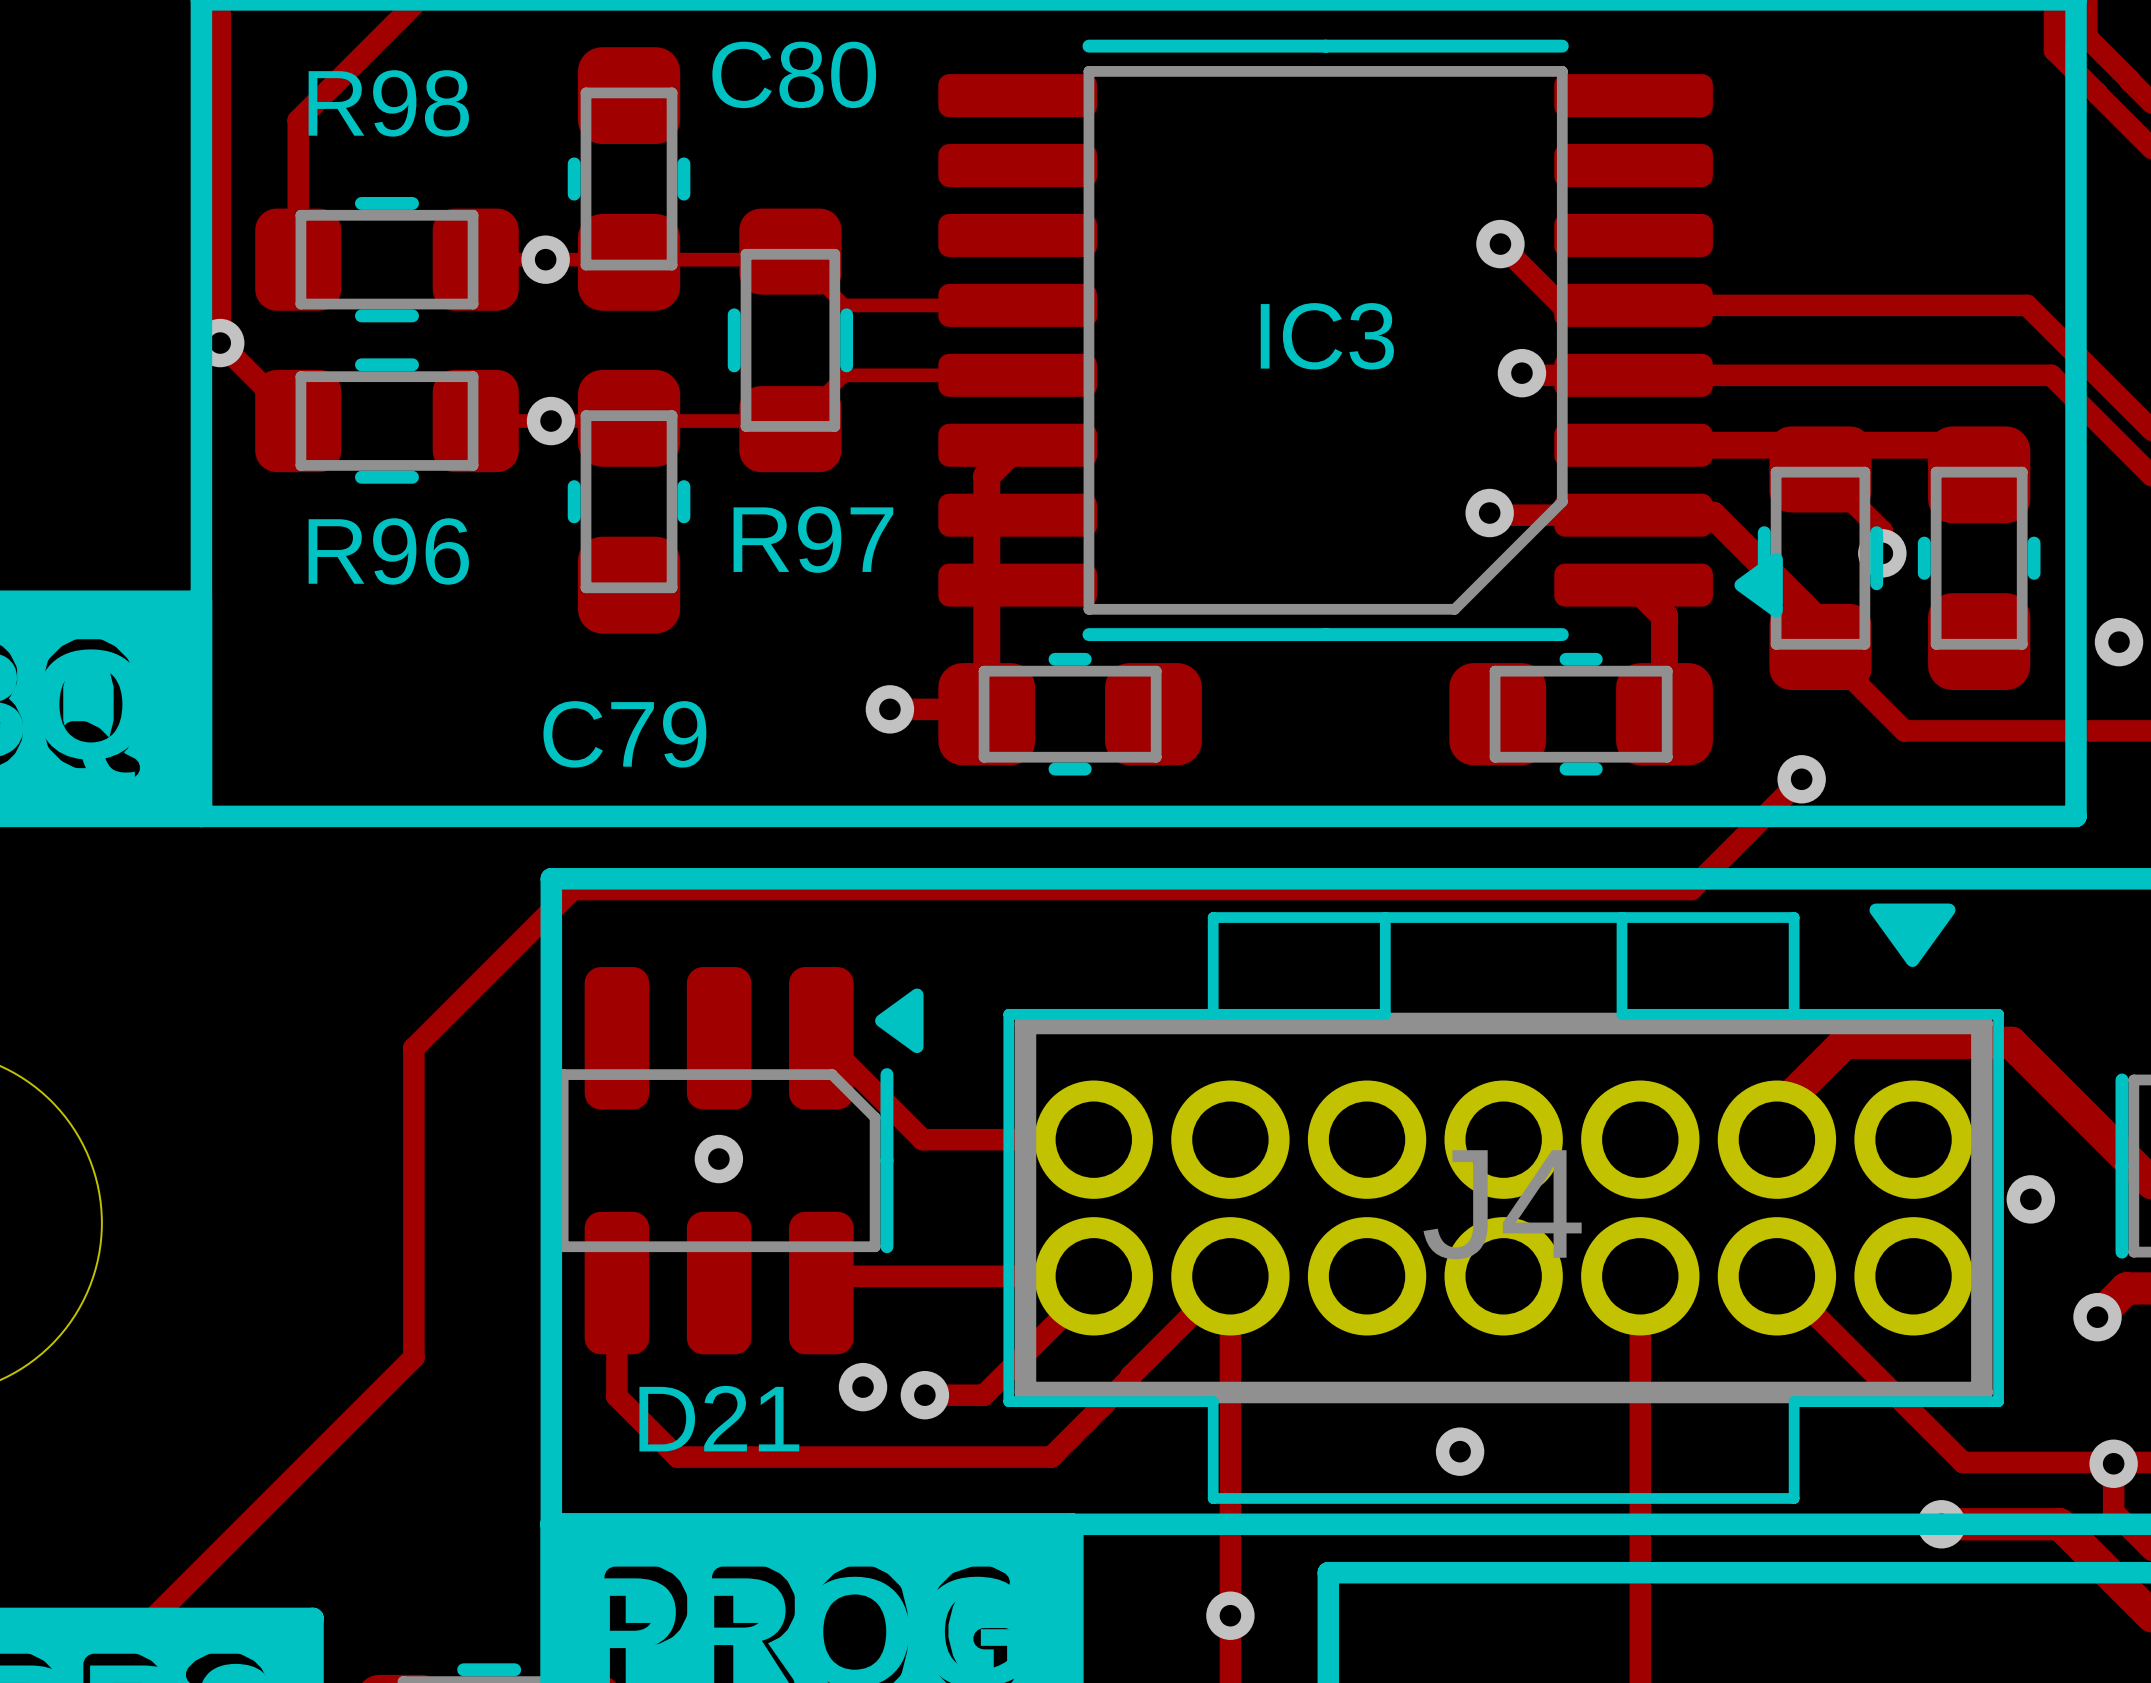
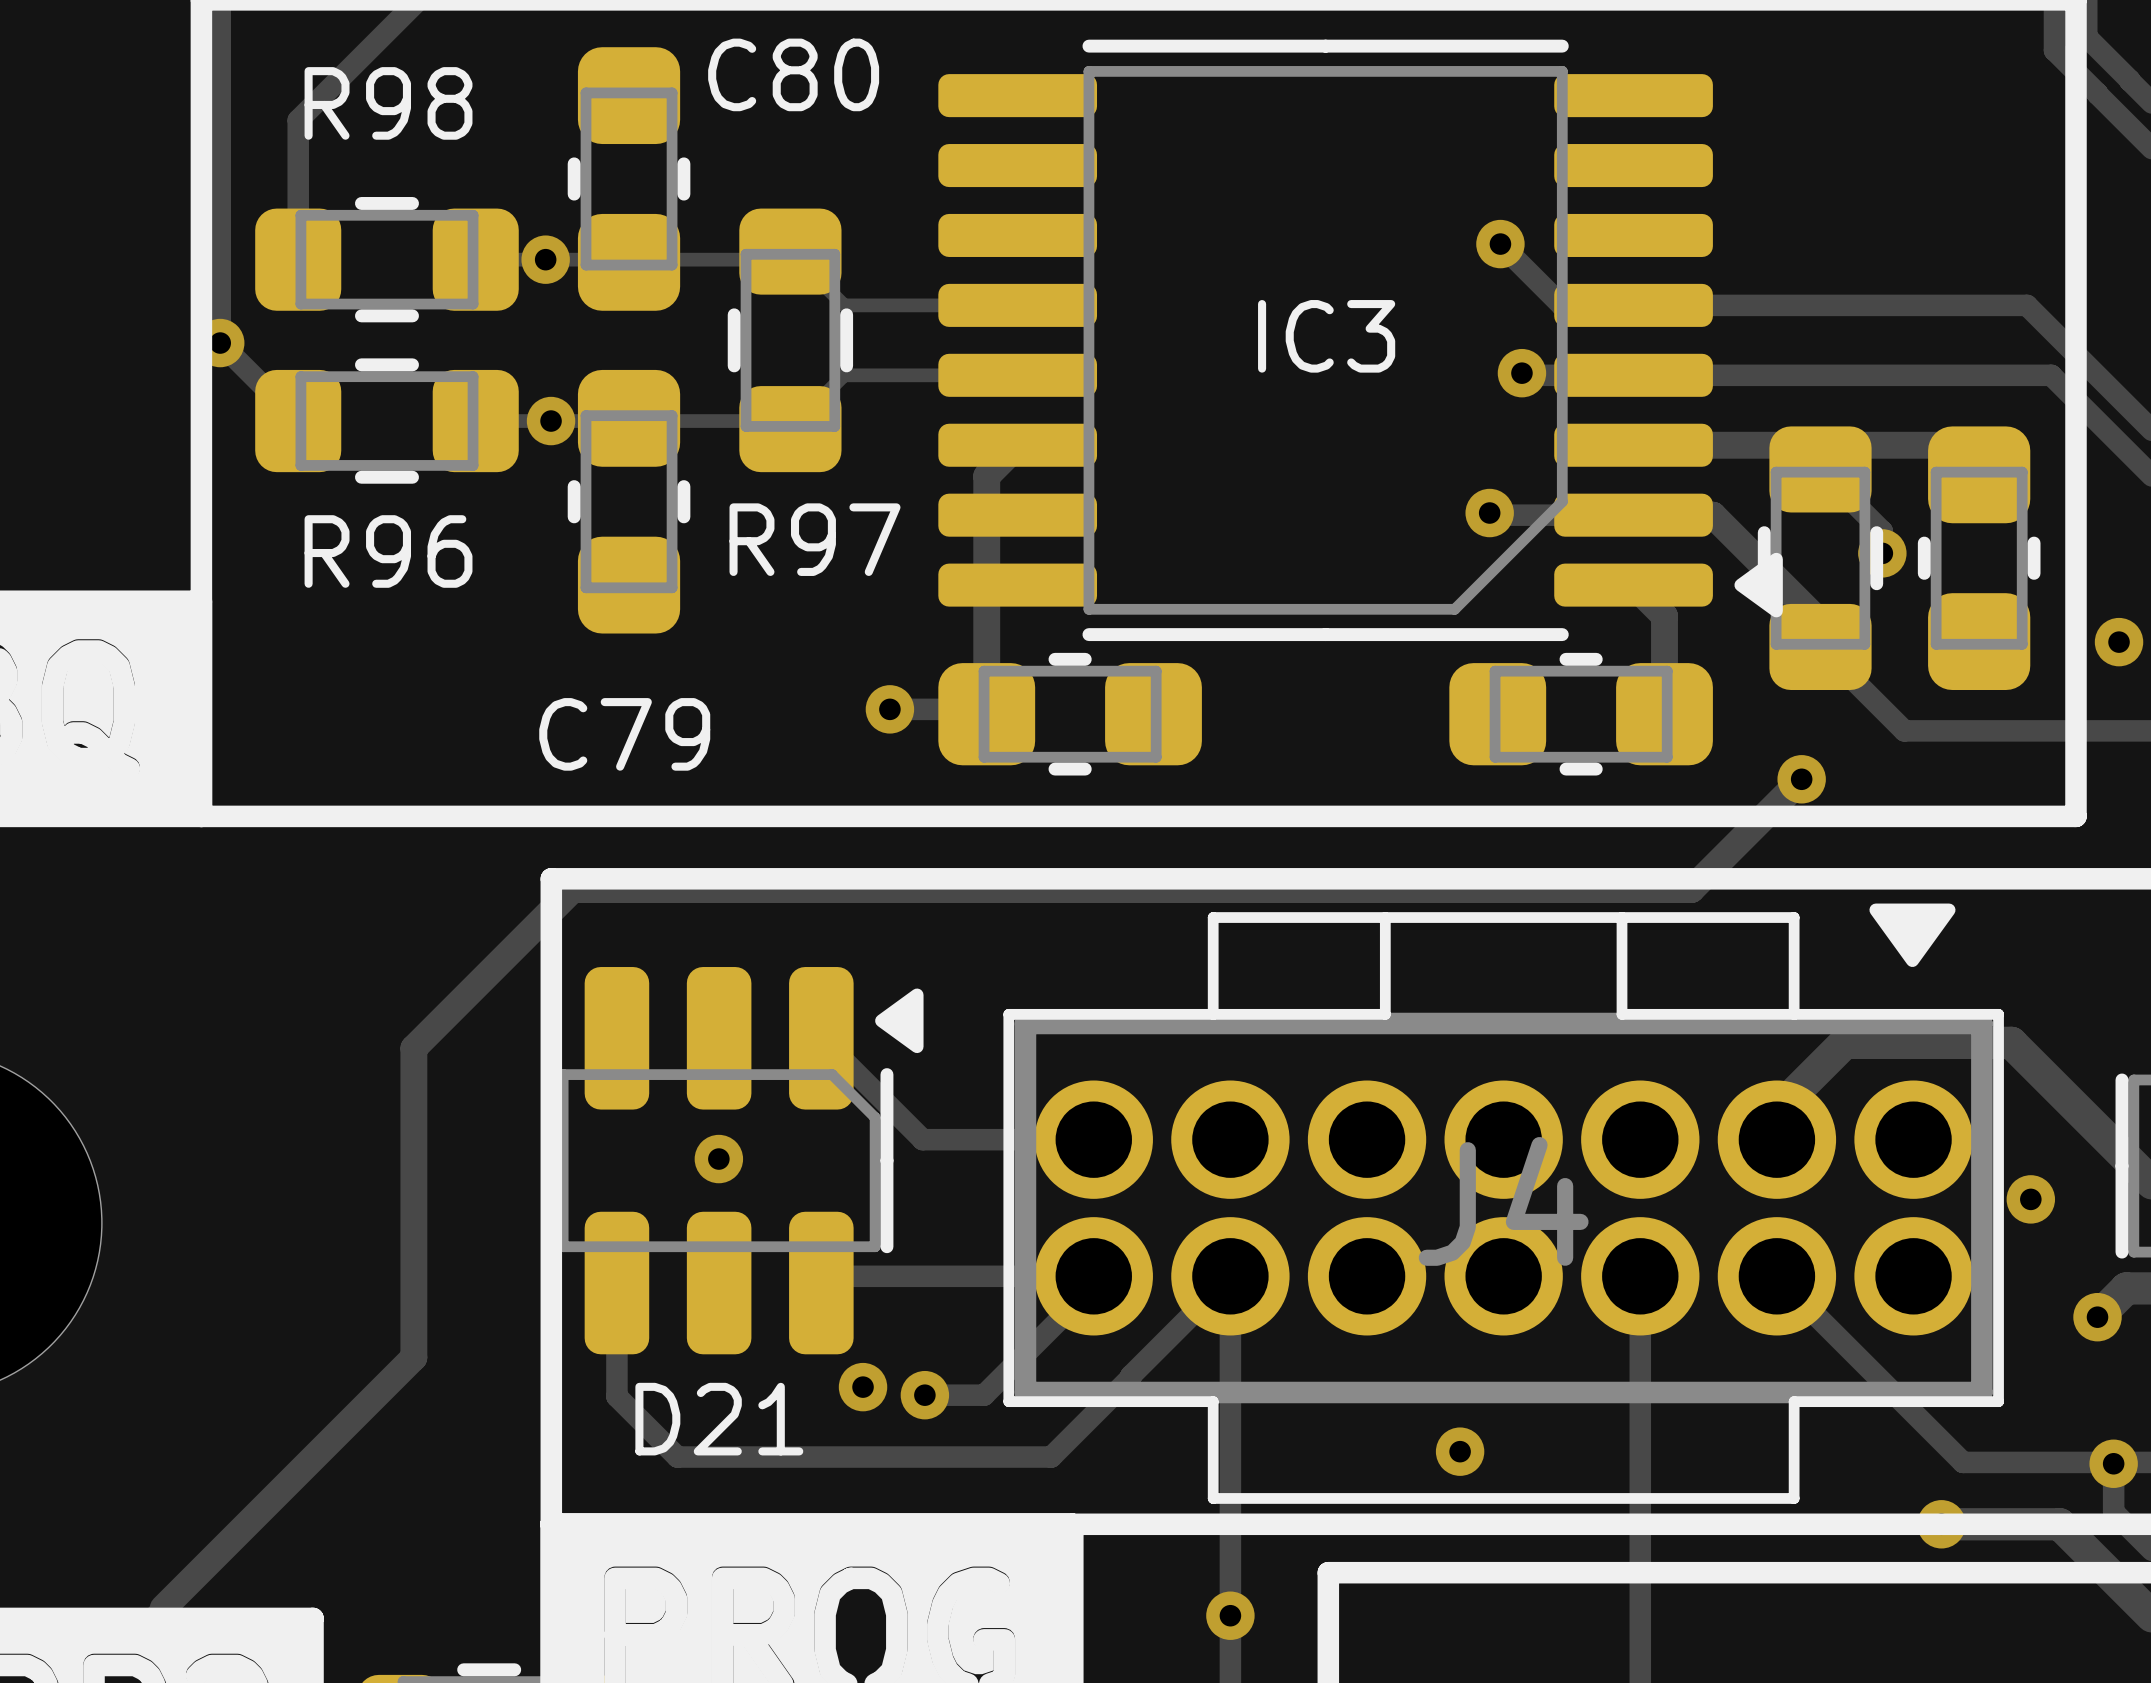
track width: thin (1801, 779) (1691, 889) (572, 889) (413, 1048) (413, 1357) (163, 1608) -> thick (1801, 779) (1691, 889) (572, 889) (413, 1048) (413, 1357) (163, 1608)

